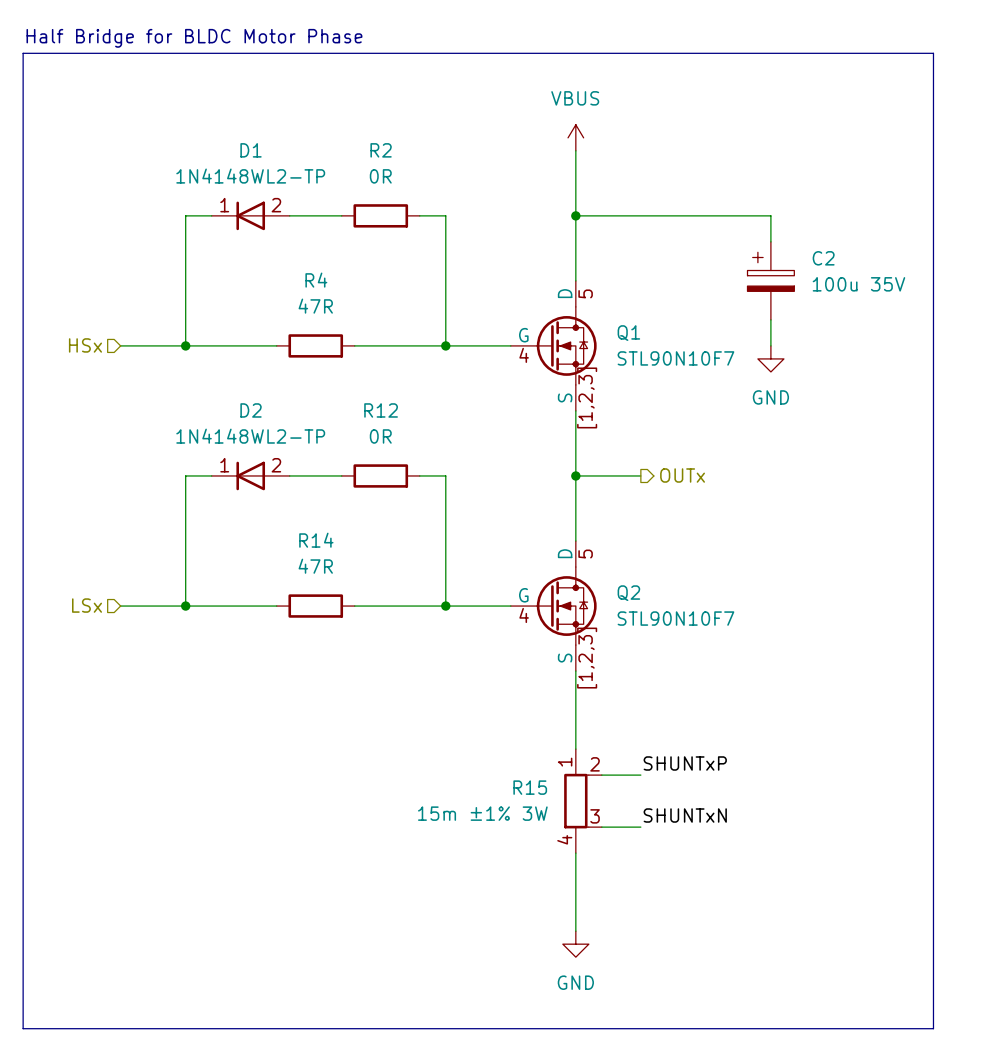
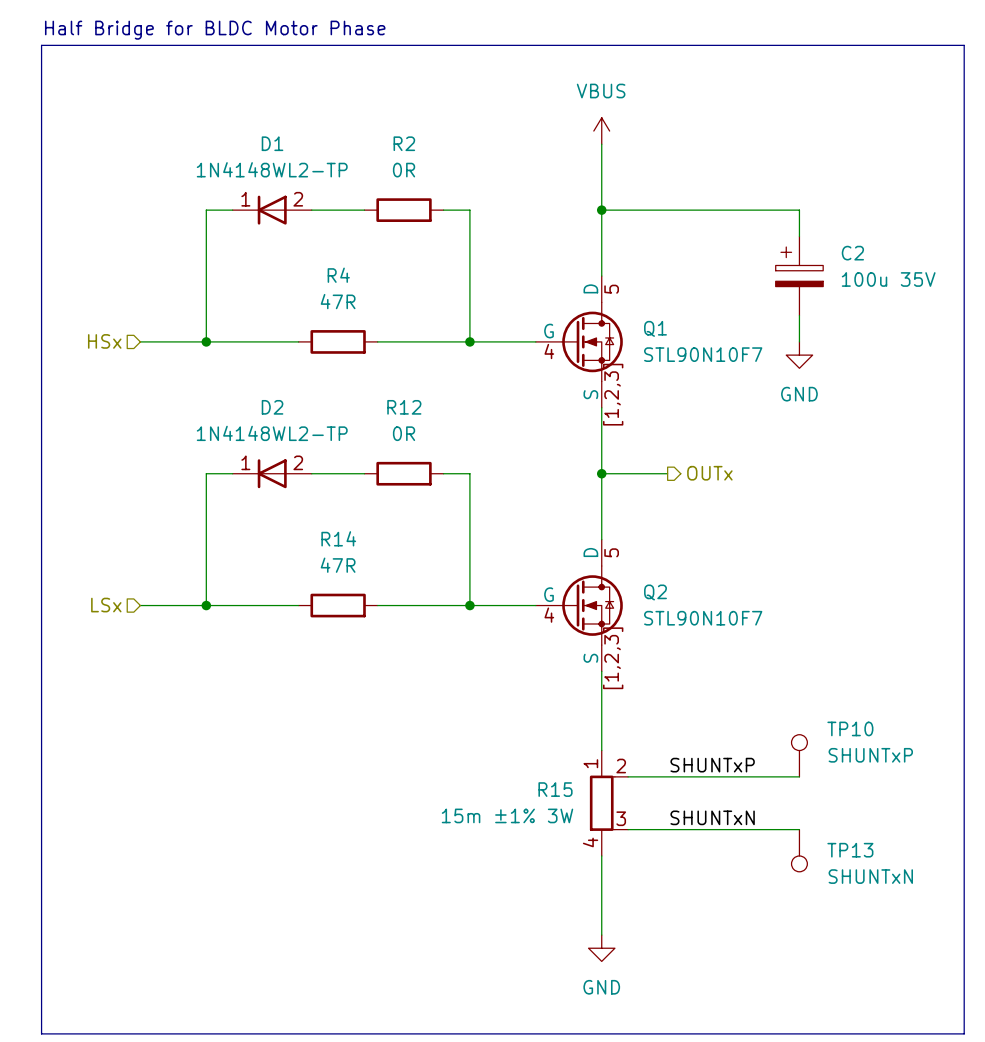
TP10: none -> SHUNTxP (799, 755)
wire: none -> (667, 776) (799, 776)
wire: none -> (667, 829) (799, 829)
TP13: none -> SHUNTxN (799, 850)

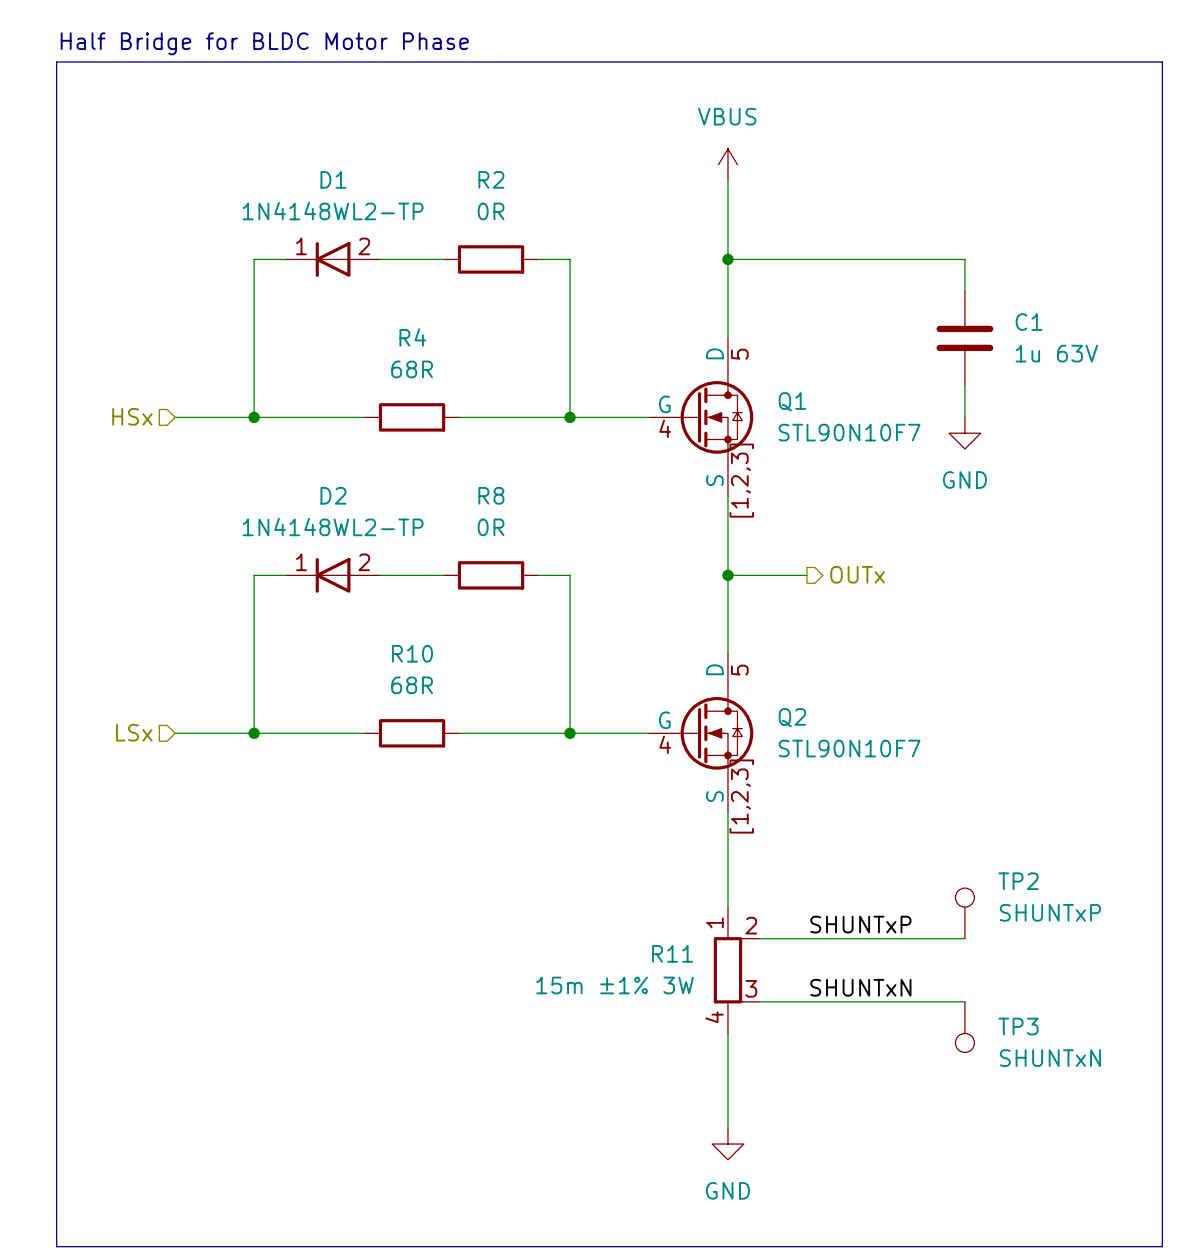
C2: 100u 35V (799, 276) -> none
C1: none -> 1u 63V (964, 338)
R4 value: 47R (338, 301) -> 68R (412, 369)
R12 name: R12 (404, 407) -> R8 (491, 495)
R14 name: R14 (338, 538) -> R10 (412, 653)
R14 value: 47R (338, 565) -> 68R (412, 685)
TP10 name: TP10 (850, 728) -> TP2 (1018, 881)
R15 name: R15 (555, 789) -> R11 (672, 953)
TP13 name: TP13 (850, 850) -> TP3 (1018, 1026)

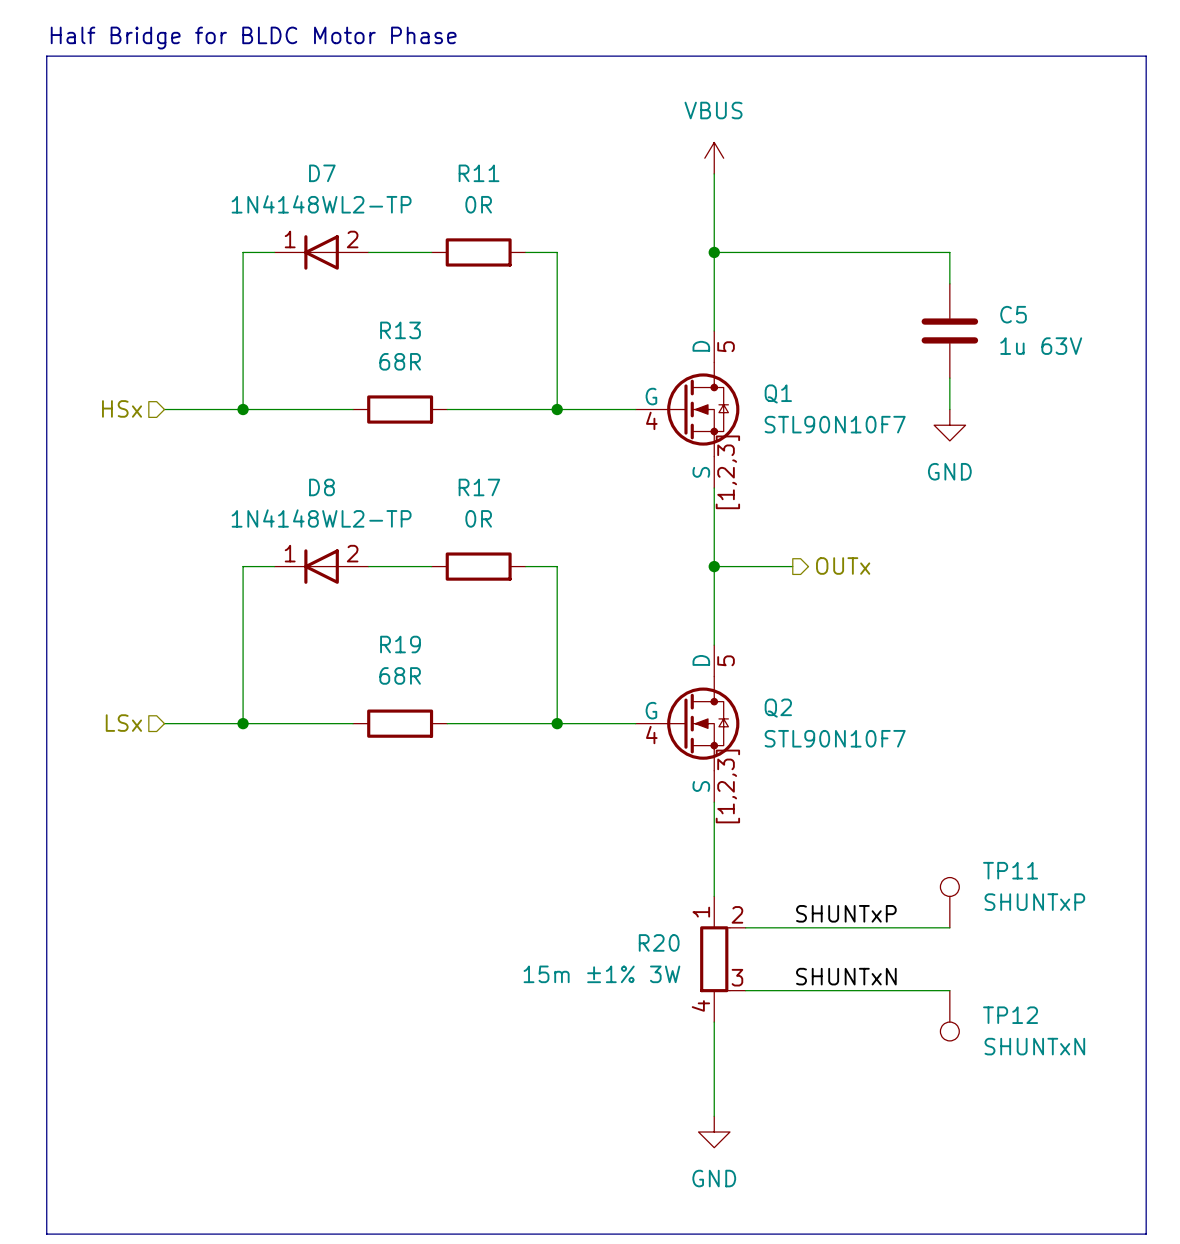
D1 name: D1 (333, 179) -> D7 (322, 173)
R2 name: R2 (491, 179) -> R11 (479, 173)
C1 name: C1 (1028, 322) -> C5 (1013, 314)
R4 name: R4 (412, 337) -> R13 (400, 330)
D2 name: D2 (333, 495) -> D8 (321, 487)
R8 name: R8 (491, 495) -> R17 (479, 487)
R10 name: R10 (412, 653) -> R19 (400, 644)
TP2 name: TP2 (1018, 881) -> TP11 (1010, 870)
R11 name: R11 (672, 953) -> R20 (659, 942)
TP3 name: TP3 (1018, 1026) -> TP12 (1010, 1015)

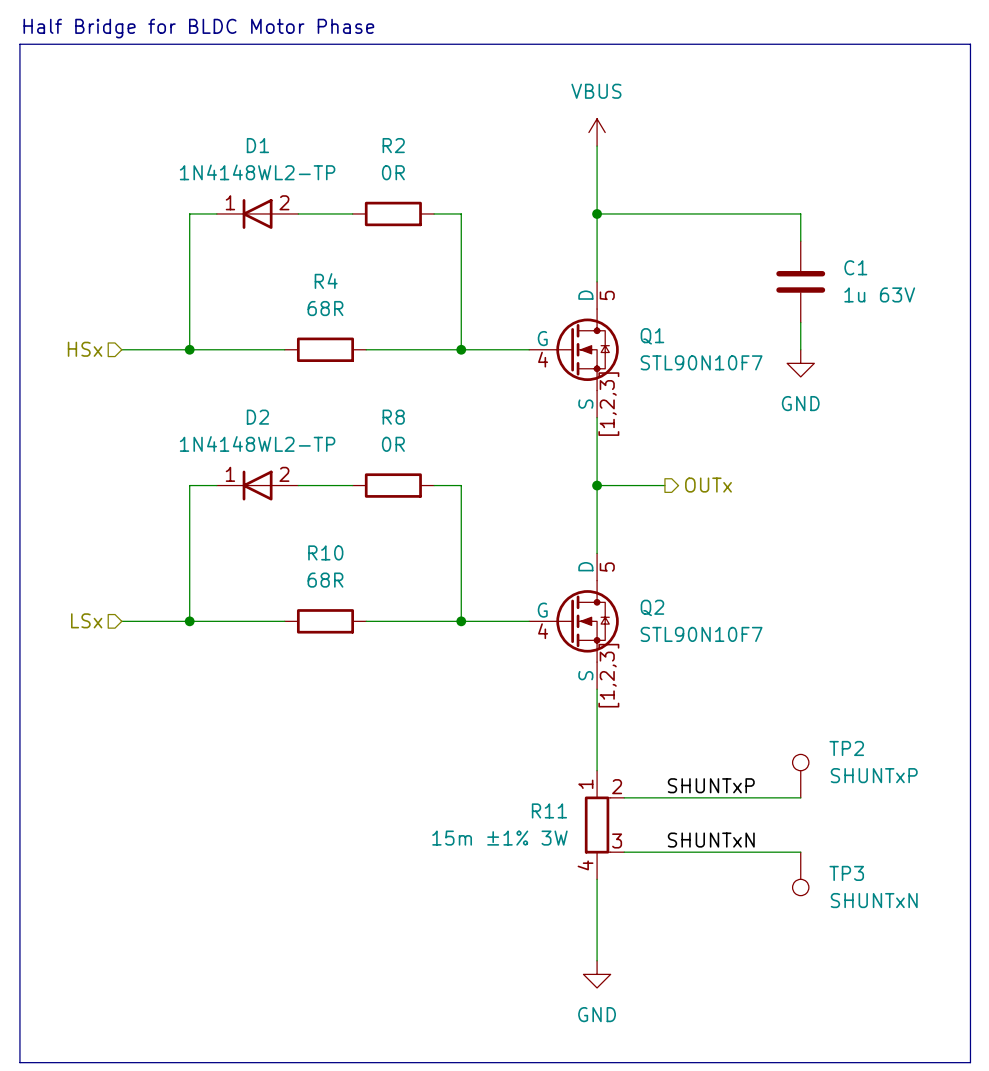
D7 name: D7 (322, 173) -> D1 (257, 145)
R11 name: R11 (479, 173) -> R2 (393, 145)
C5 name: C5 (1013, 314) -> C1 (855, 267)
R13 name: R13 (400, 330) -> R4 (326, 281)
D8 name: D8 (321, 487) -> D2 (257, 417)
R17 name: R17 (479, 487) -> R8 (393, 417)
R19 name: R19 (400, 644) -> R10 (325, 552)
TP11 name: TP11 (1010, 870) -> TP2 (846, 748)
R20 name: R20 (659, 942) -> R11 (549, 810)
TP12 name: TP12 (1010, 1015) -> TP3 (846, 873)

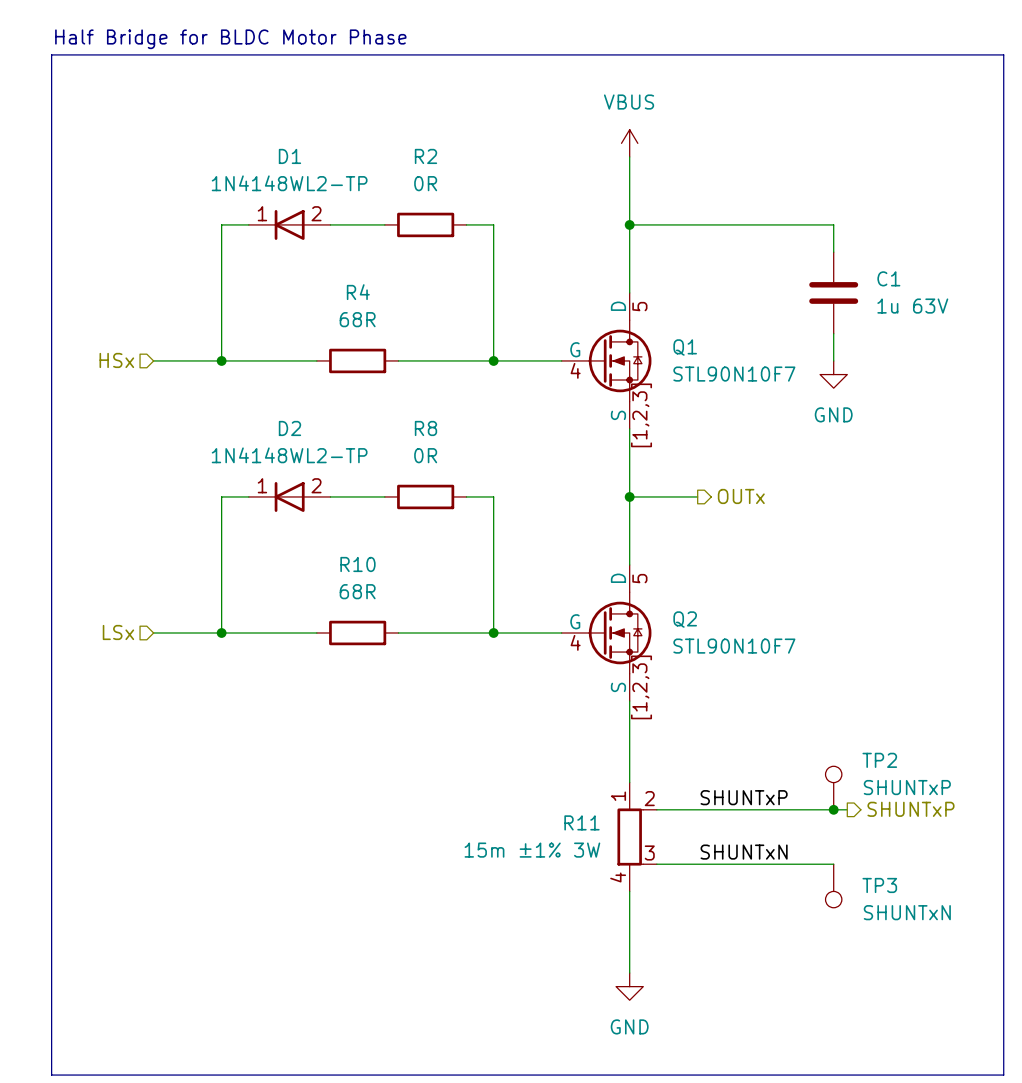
wire: none -> (833, 809) (847, 809)
junction: none -> (833, 809)
hierarchical label: none -> SHUNTxP (910, 809)

